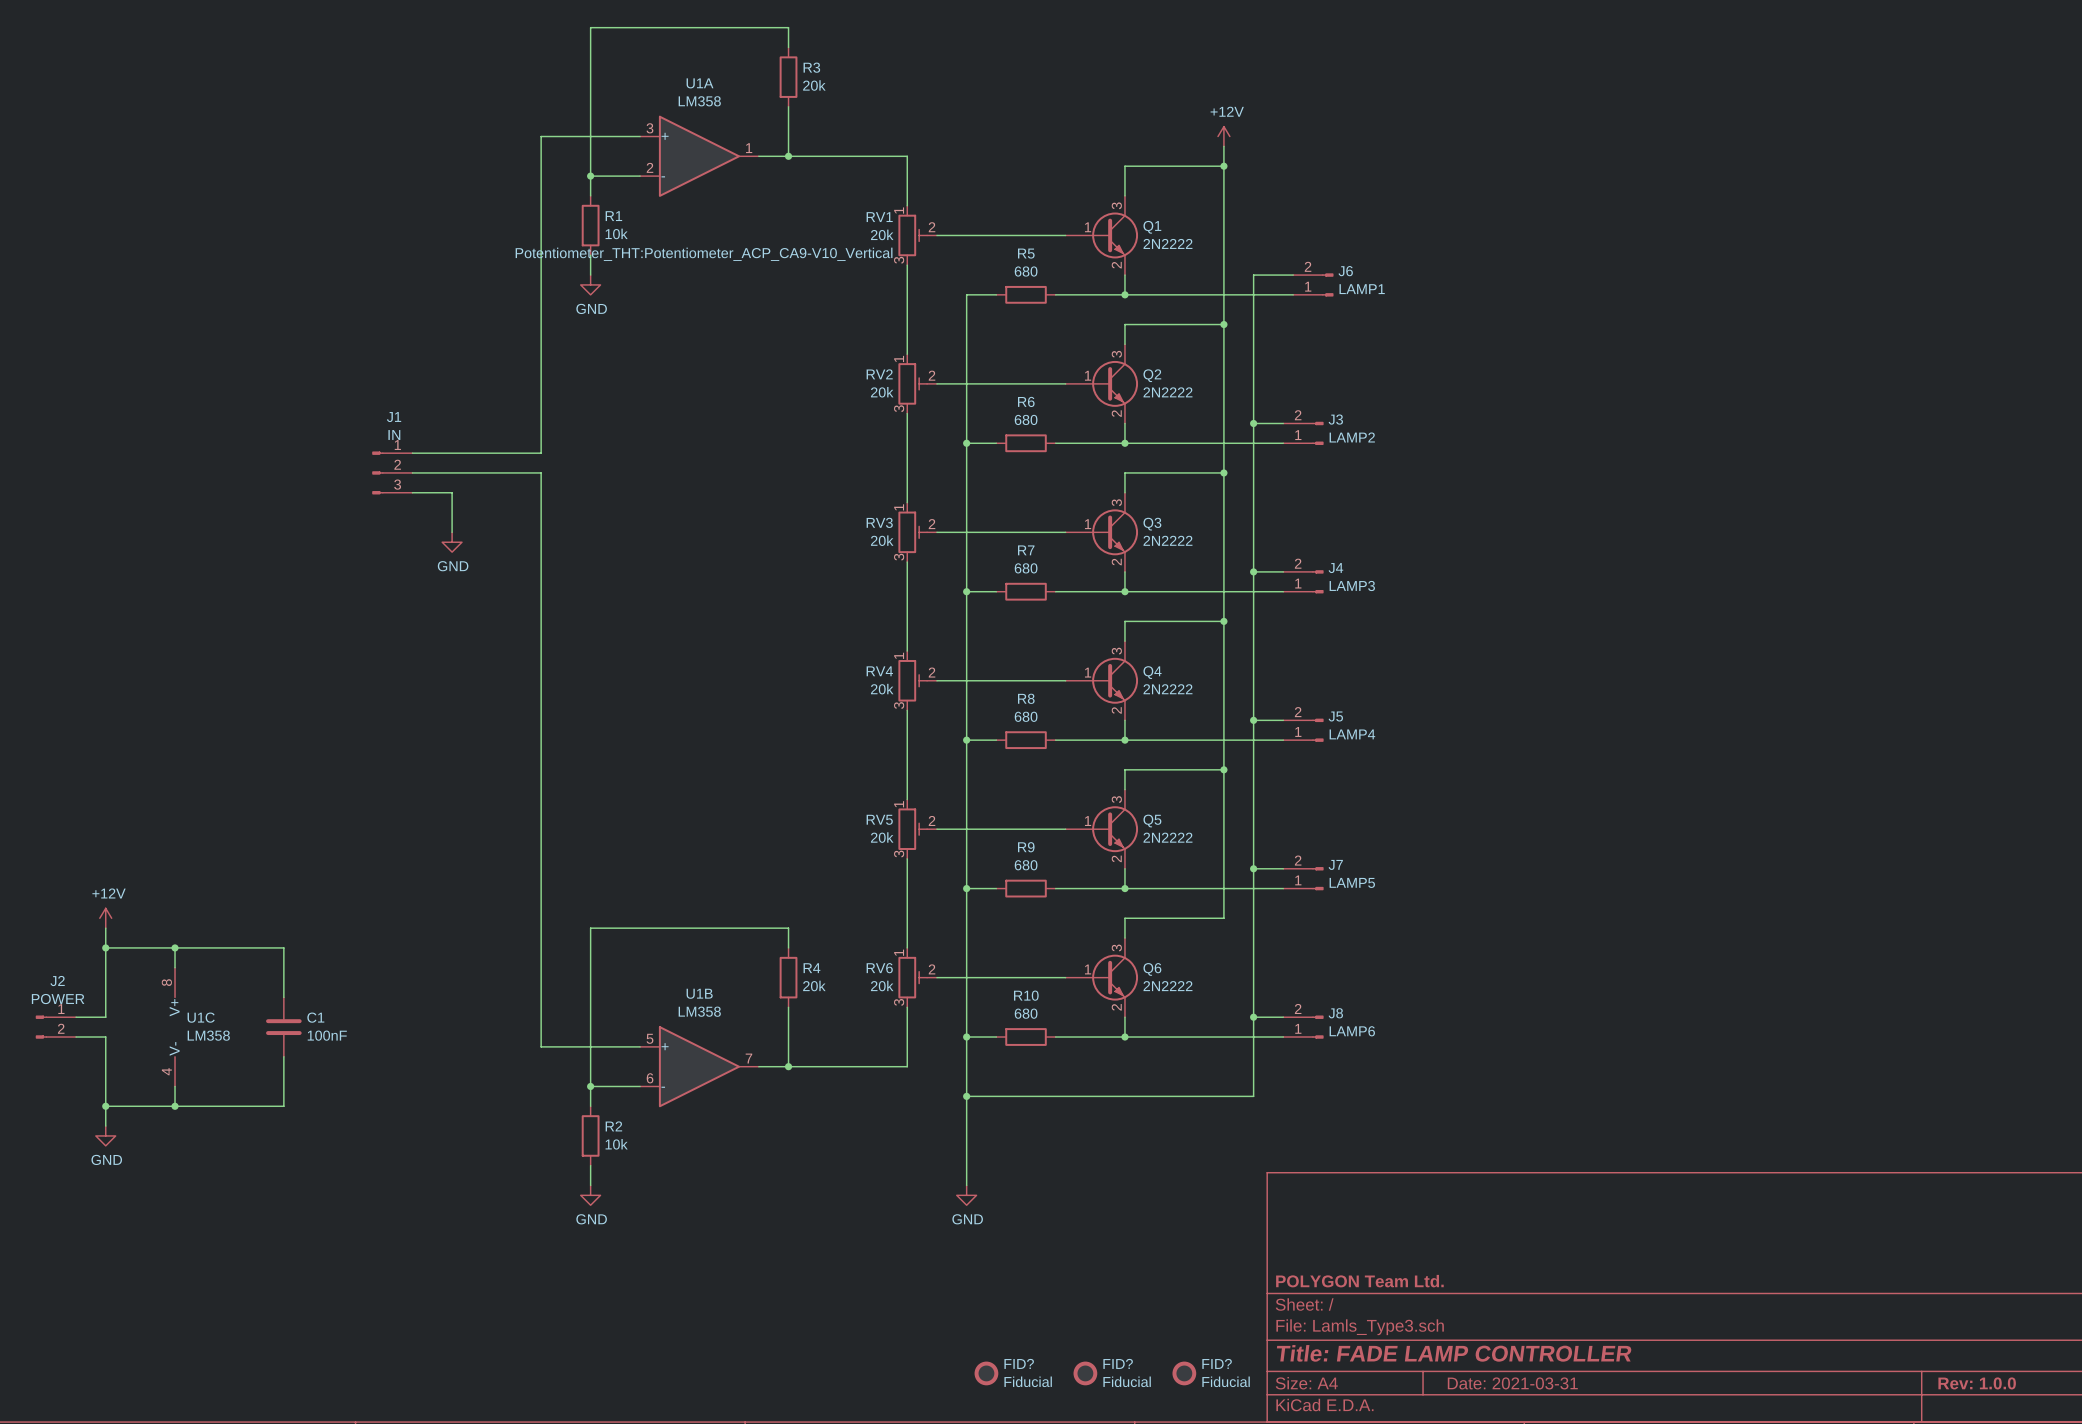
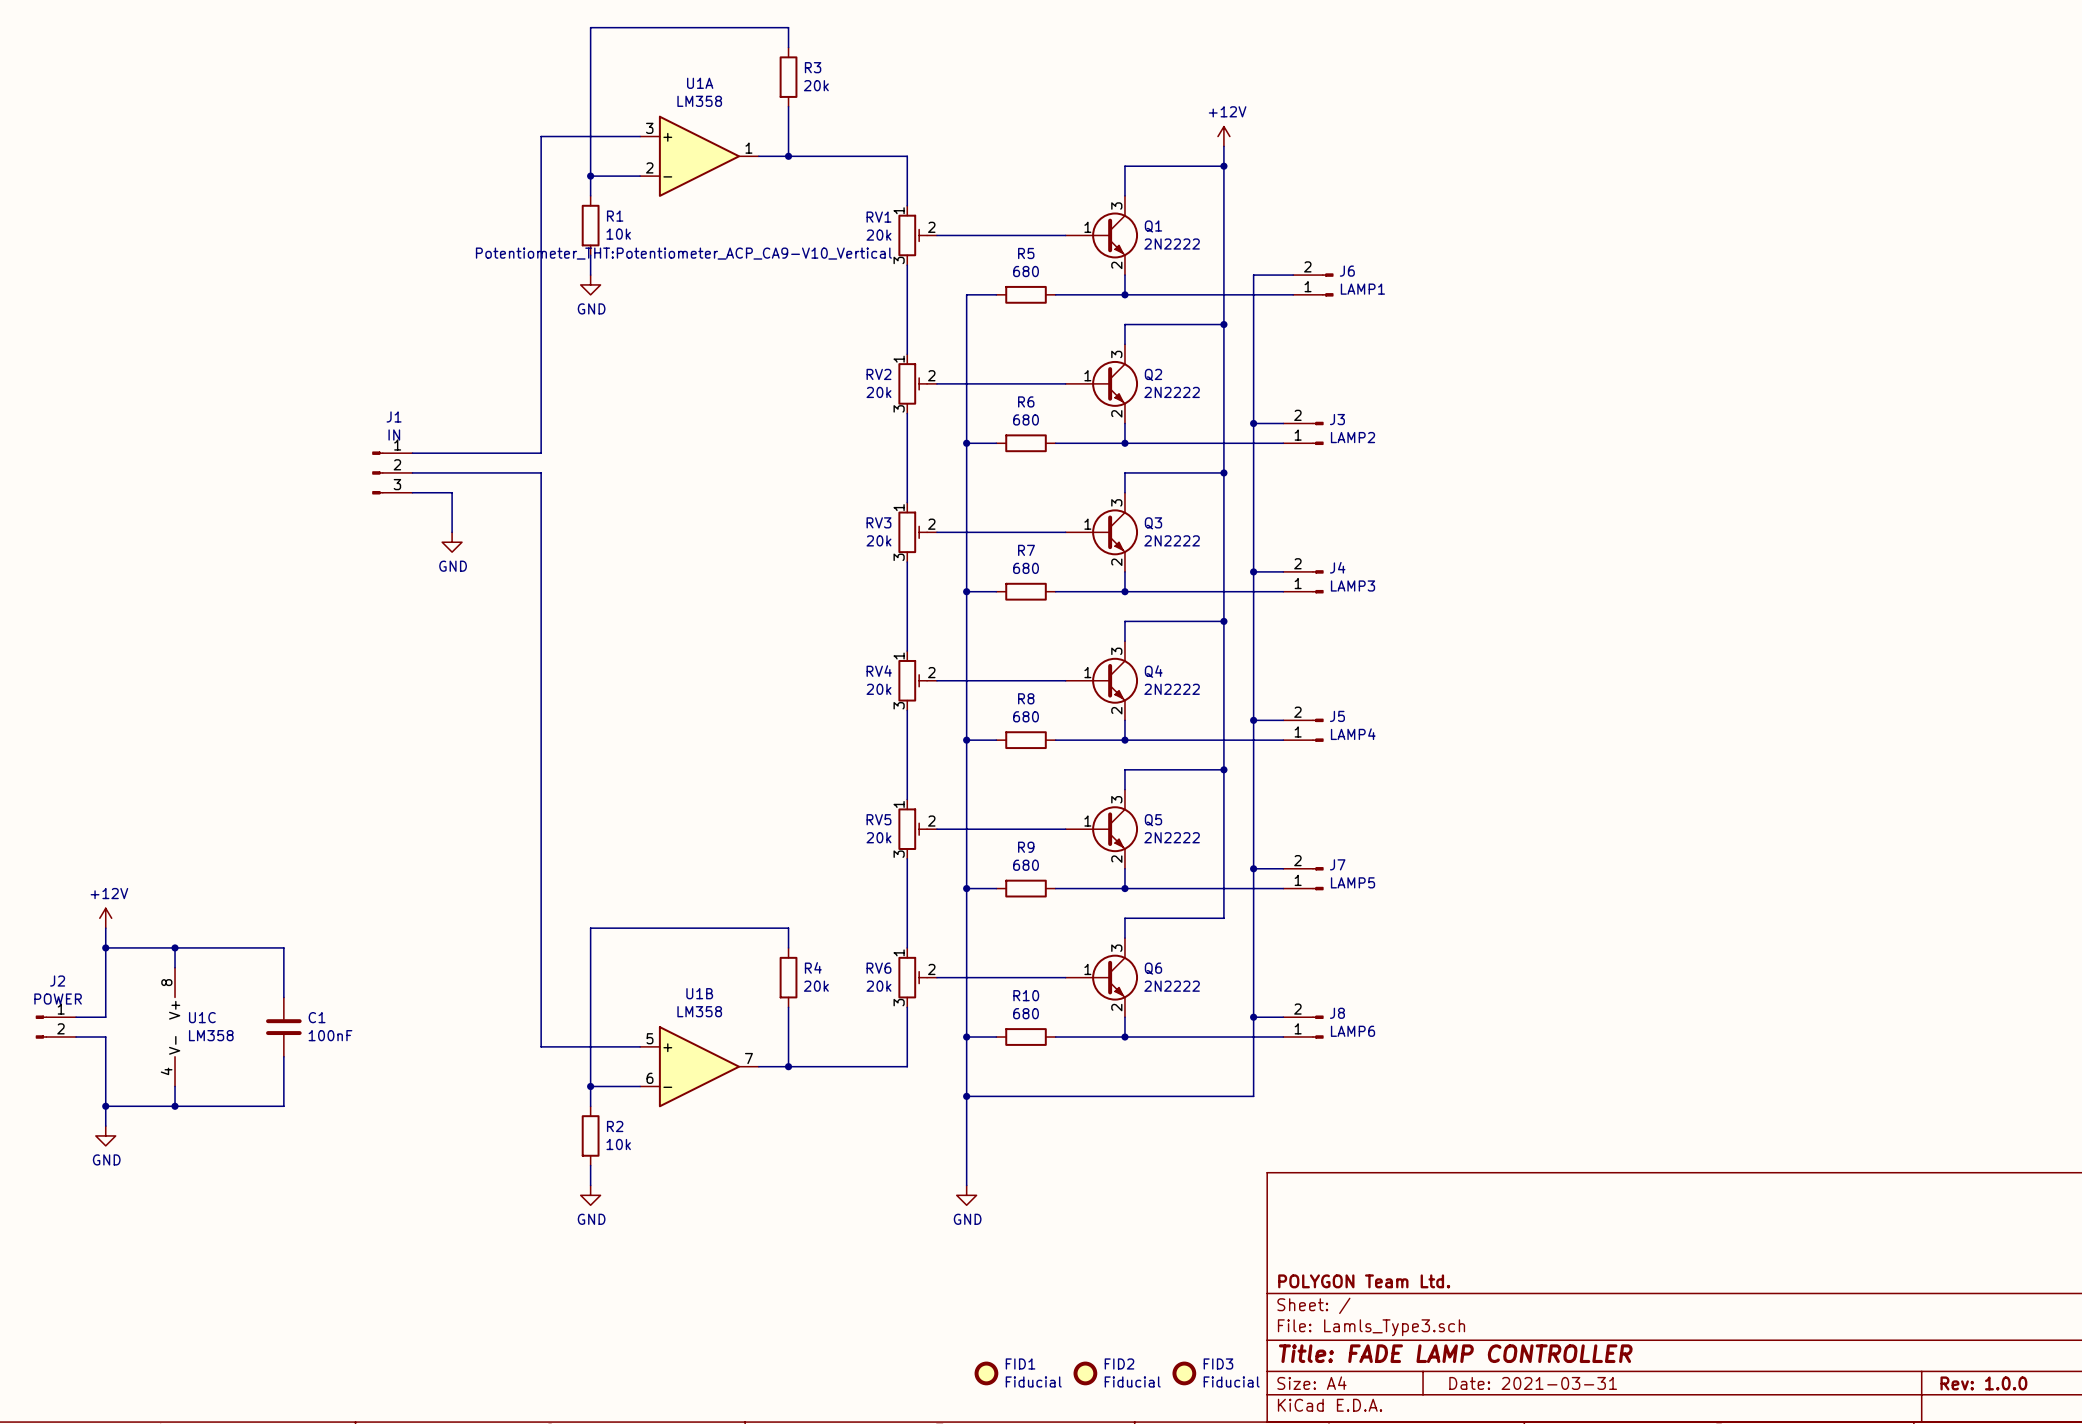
FID? name: FID? (1019, 1363) -> FID1 (1020, 1363)
FID? name: FID? (1118, 1363) -> FID2 (1119, 1363)
FID? name: FID? (1217, 1363) -> FID3 (1218, 1363)

